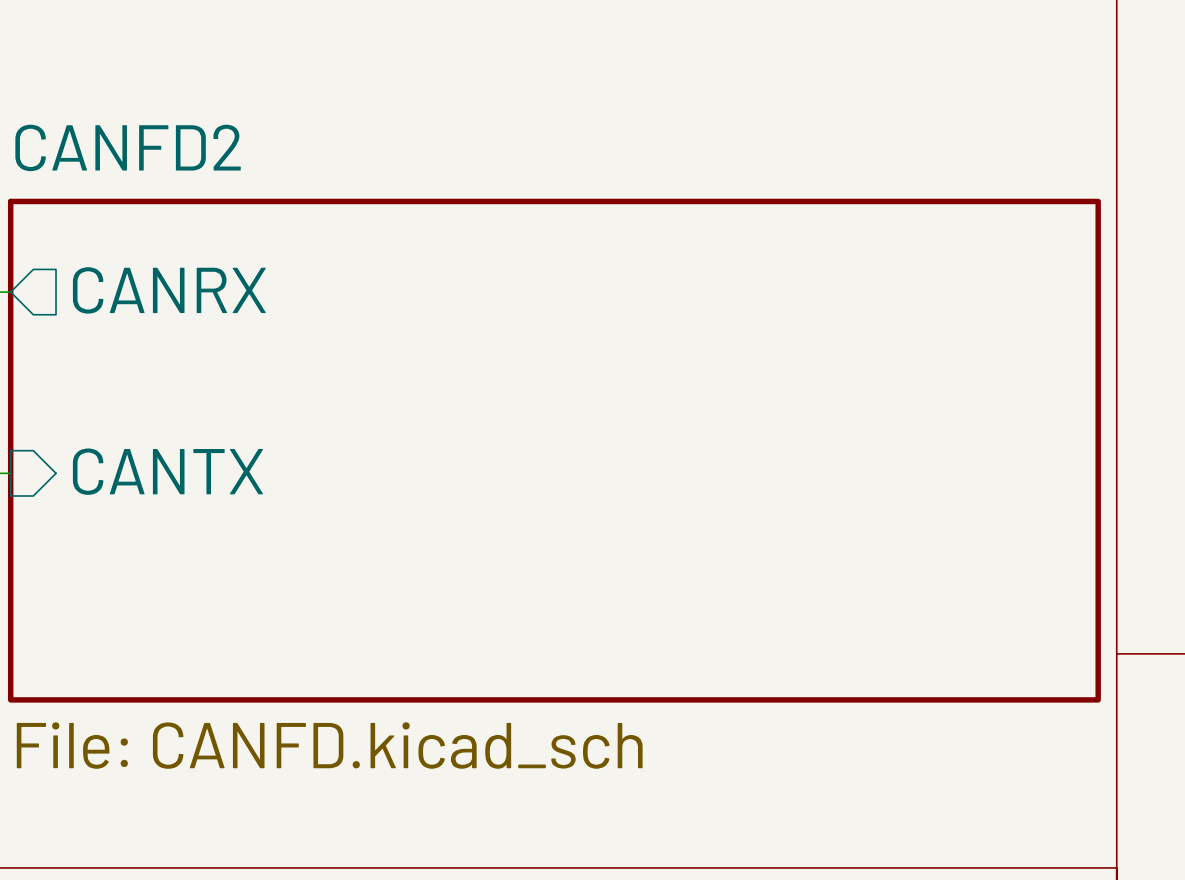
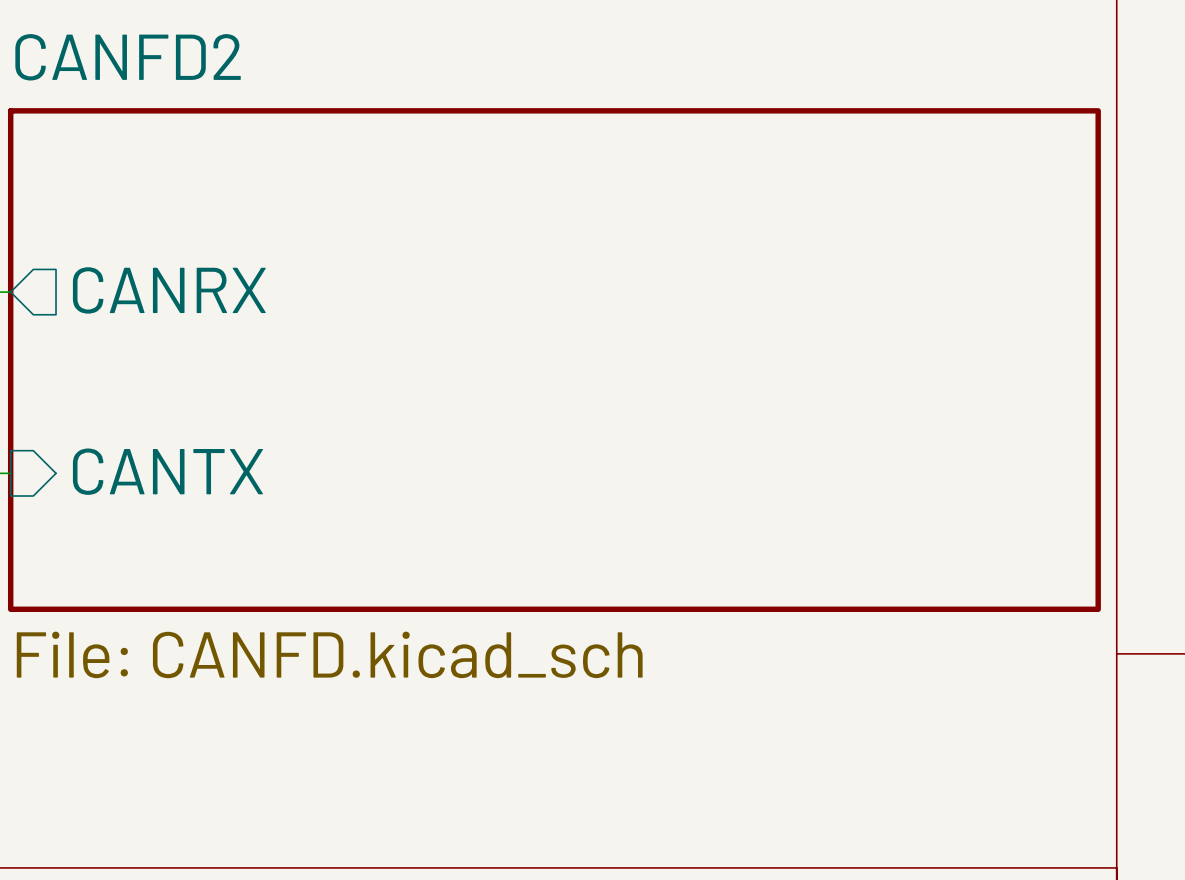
sheet CANFD2 position: (554, 450) -> (554, 360)

